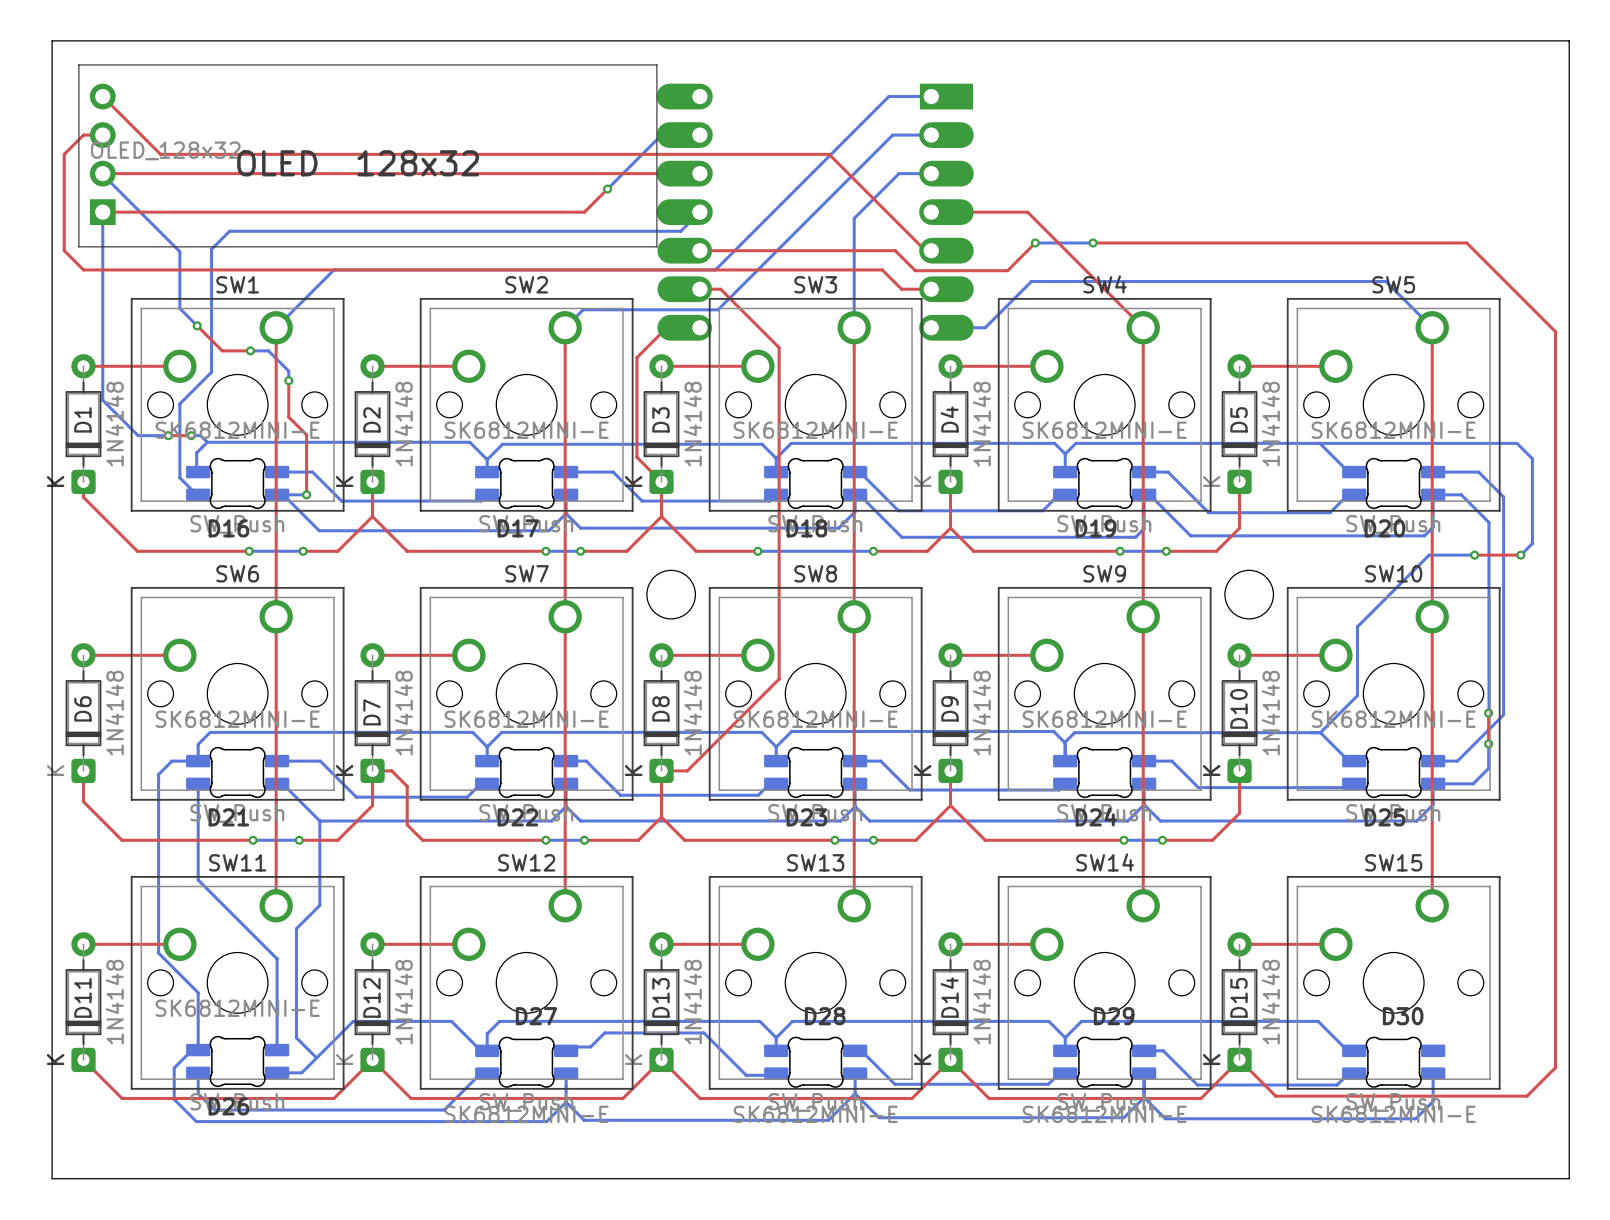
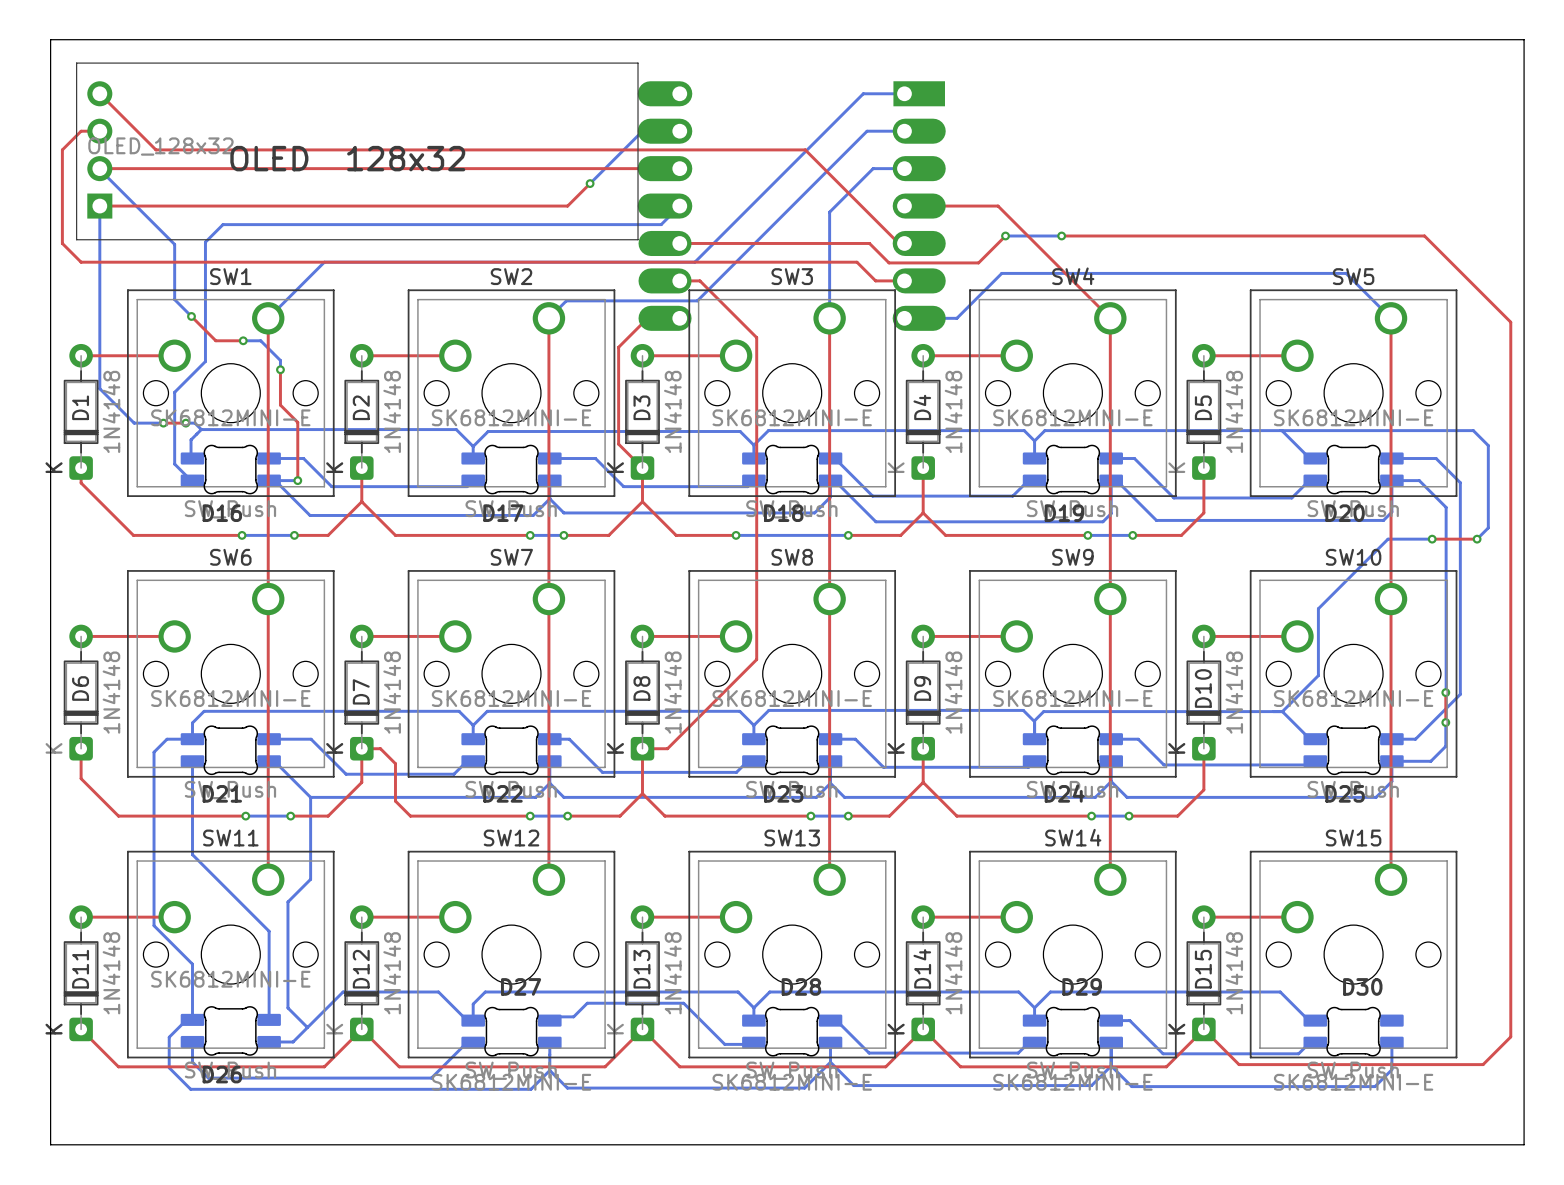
round board edge: [646, 569, 696, 620] -> none
round board edge: [1224, 569, 1274, 620] -> none

